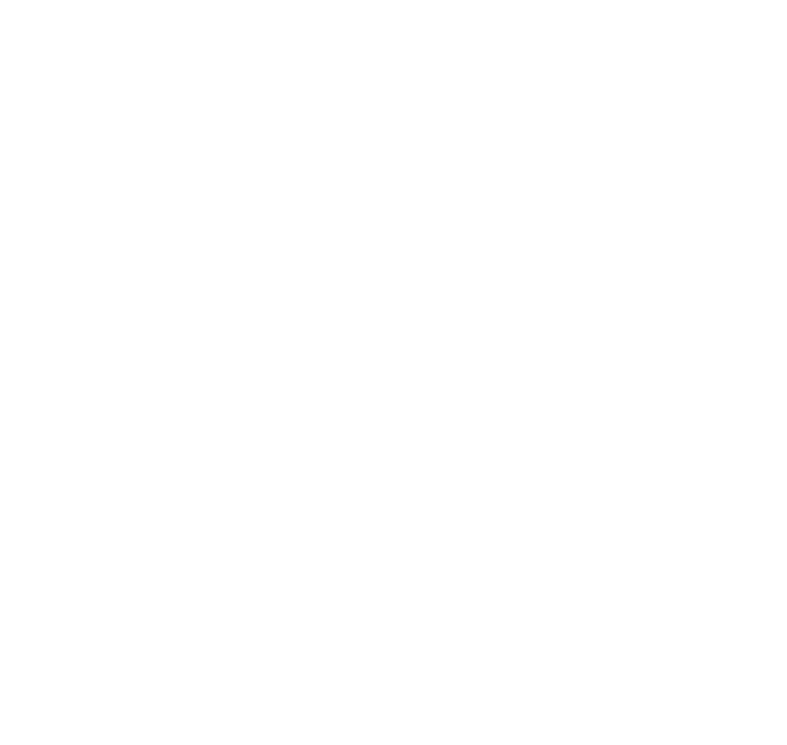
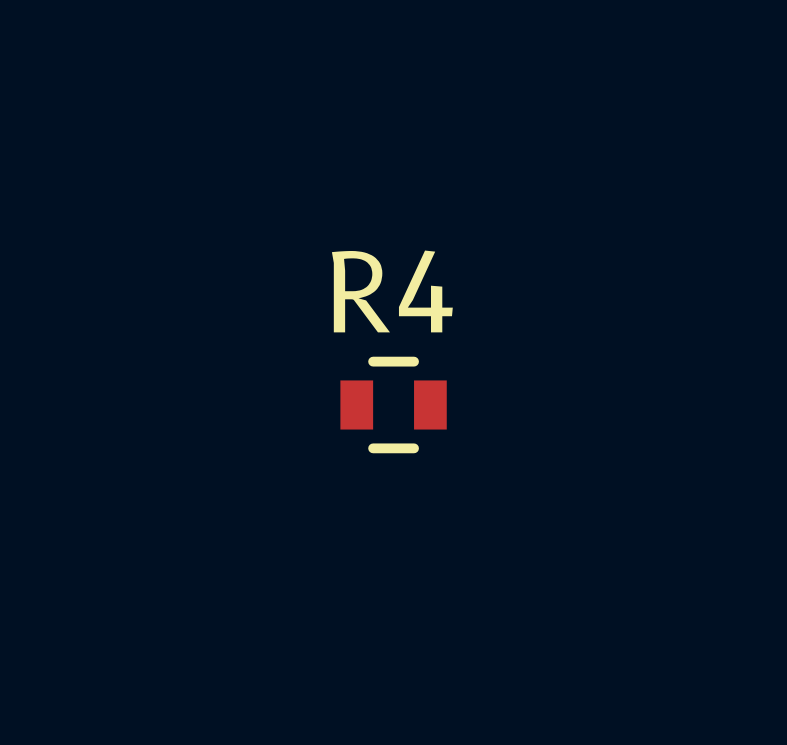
R4: none -> (393, 404)

